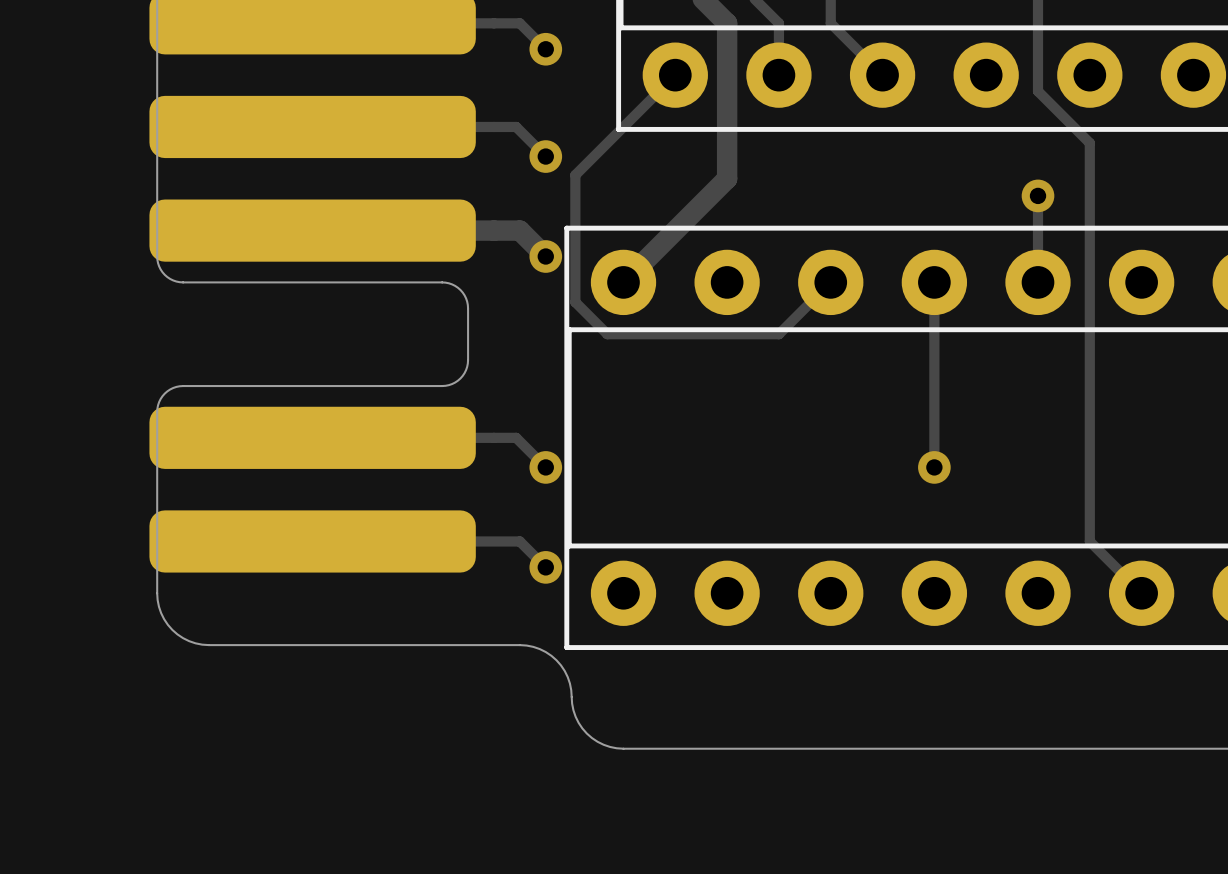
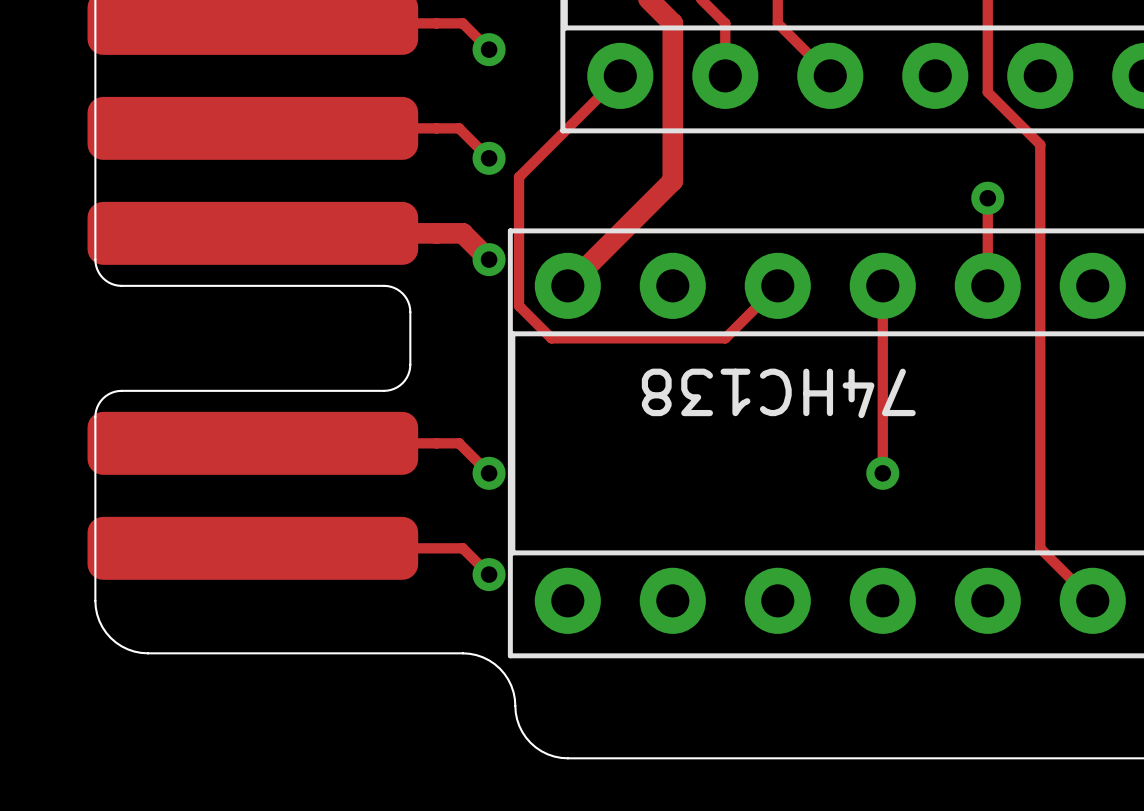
part value: none -> 74HC138 (778, 393)

